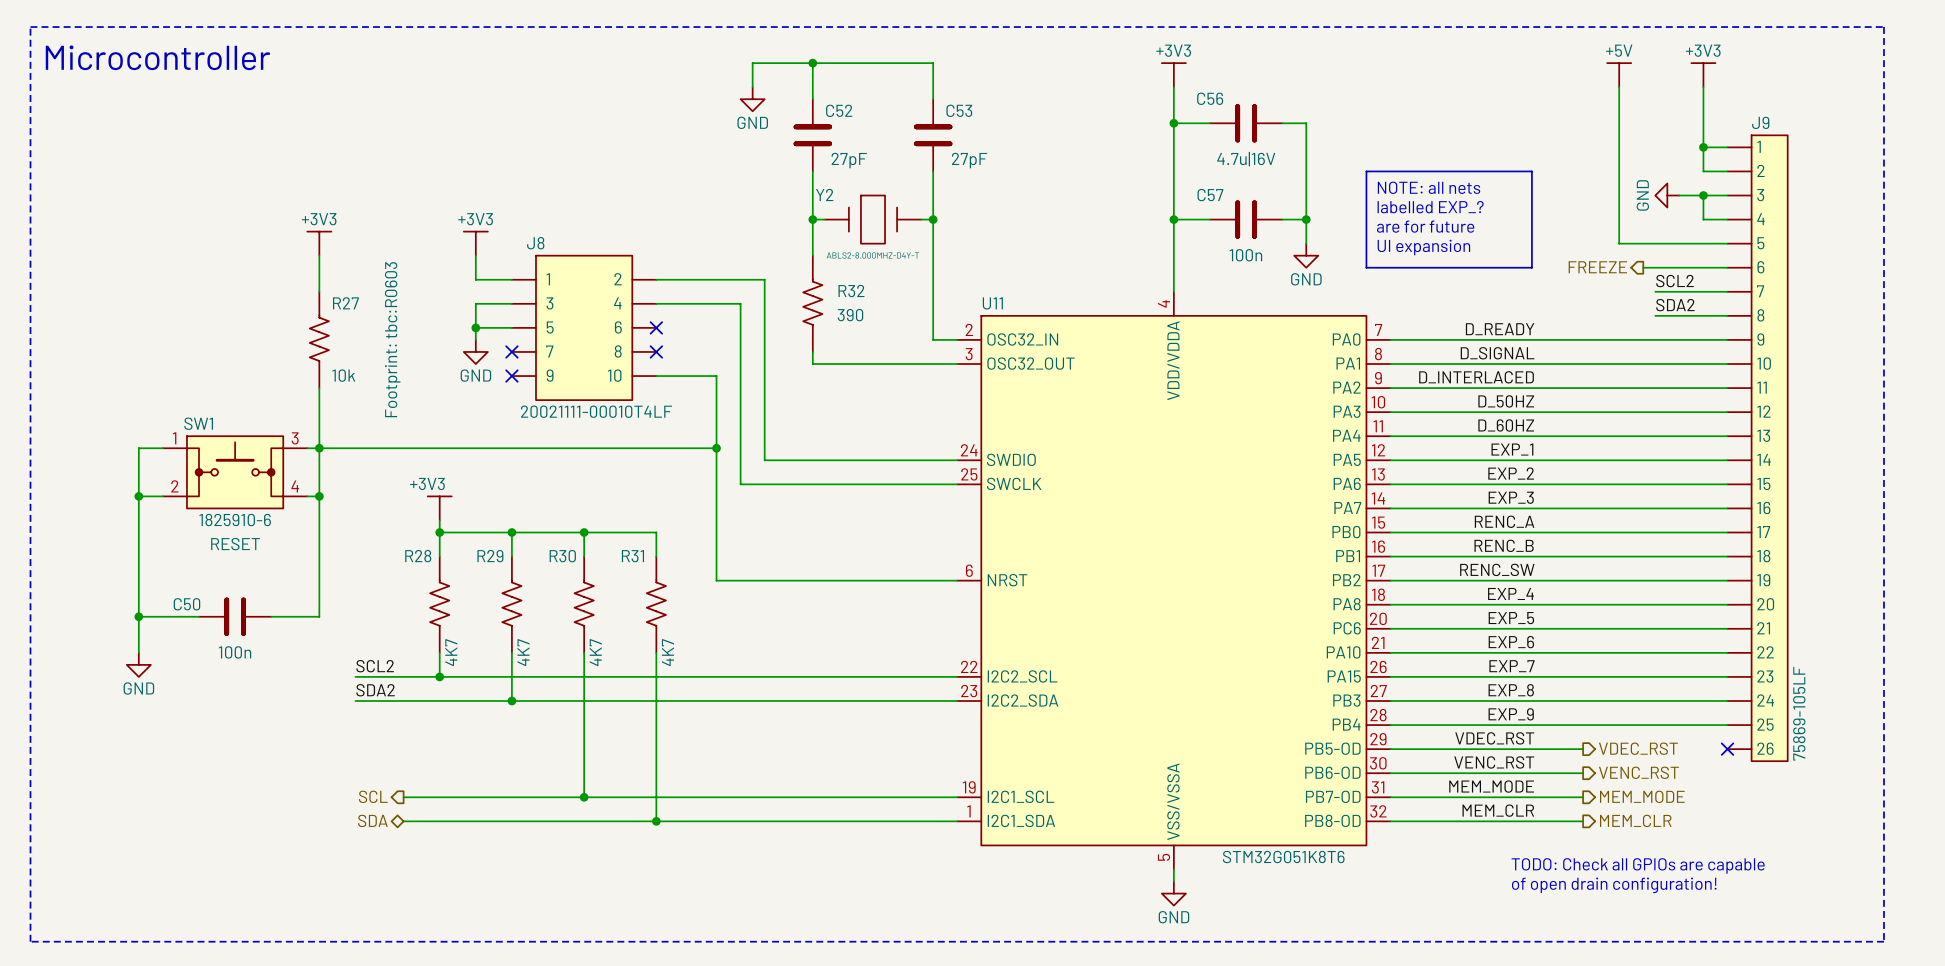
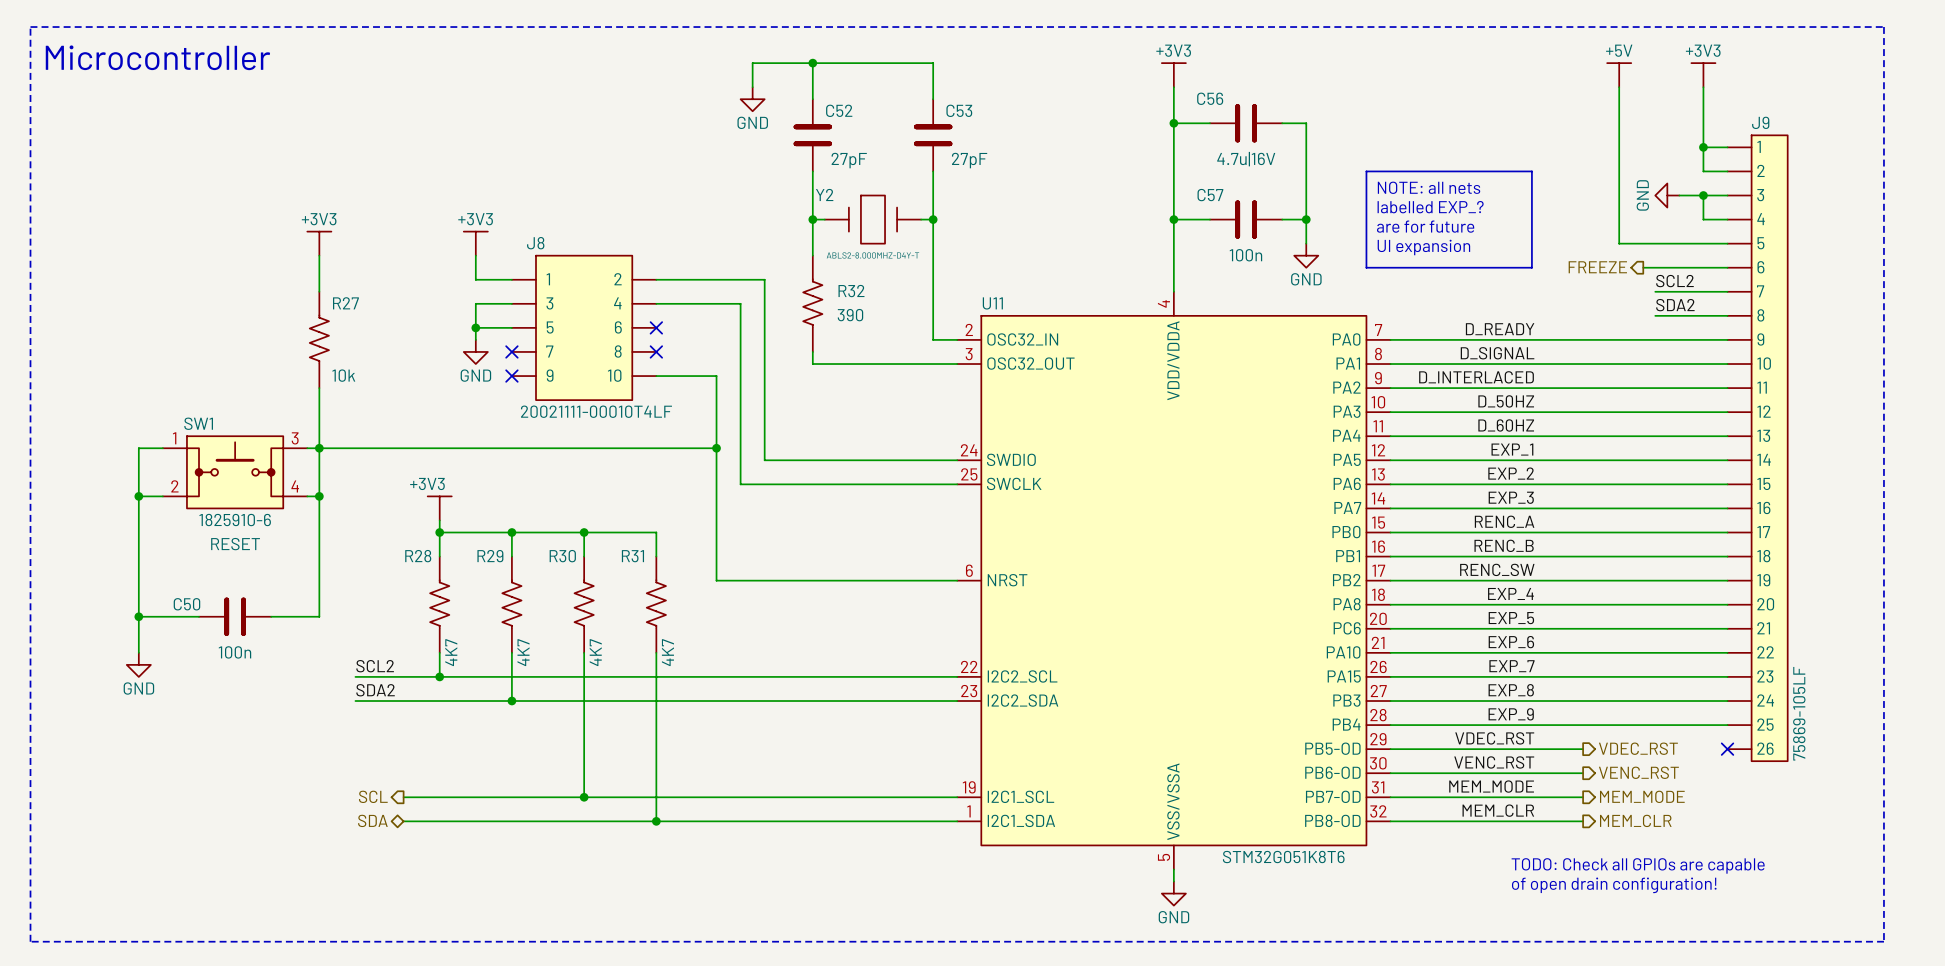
R27 text: Footprint: tbc:R0603 (392, 339) -> none

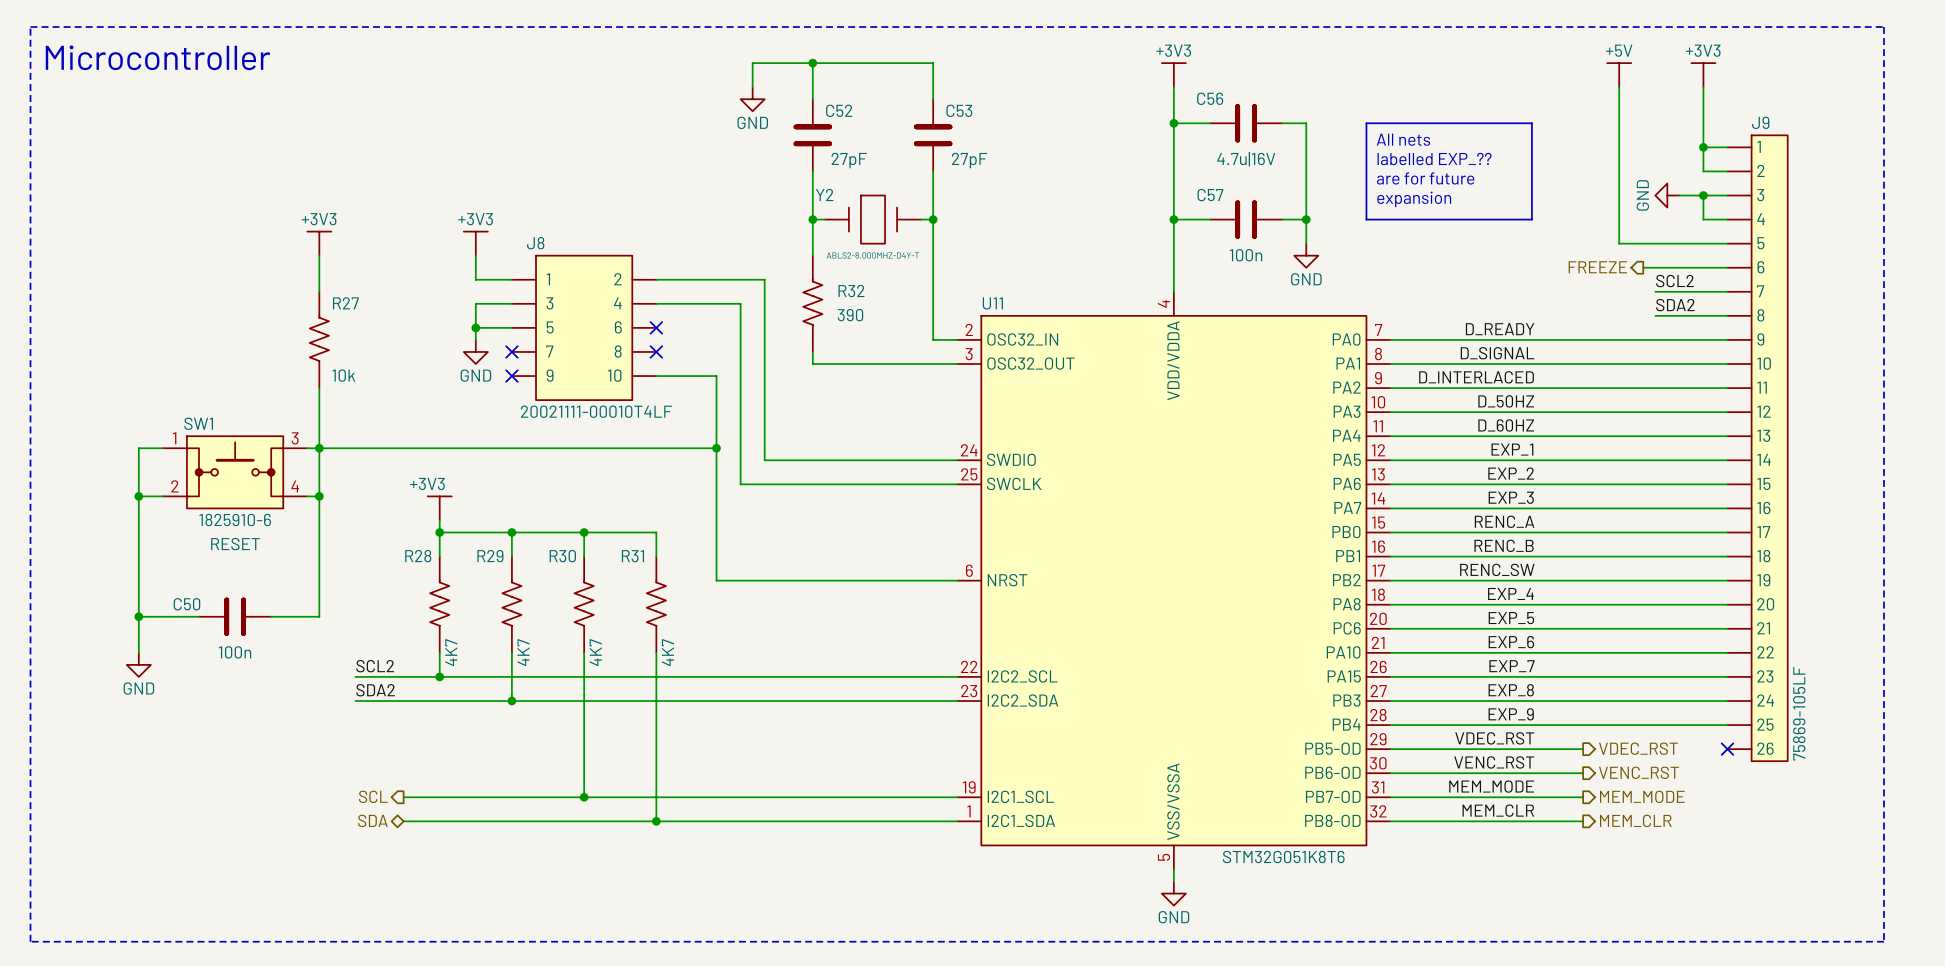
text: none -> All nets (1403, 139)
text: none -> labelled EXP_?? (1434, 159)
line: (1366, 171) (1531, 171) -> (1366, 171) (1366, 123) (1531, 123) (1531, 171)
text: NOTE: all nets (1429, 187) -> none
text: none -> expansion (1414, 199)
text: labelled EXP_? (1430, 207) -> none
line: (1366, 219) (1366, 267) (1531, 267) (1531, 219) -> (1366, 219) (1531, 219)
text position: are for future (1425, 226) -> are for future (1425, 178)
text: UI expansion (1423, 247) -> none
text: TODO: Check all GPIOs are capable (1638, 865) -> none
text: of open drain configuration! (1614, 885) -> none

